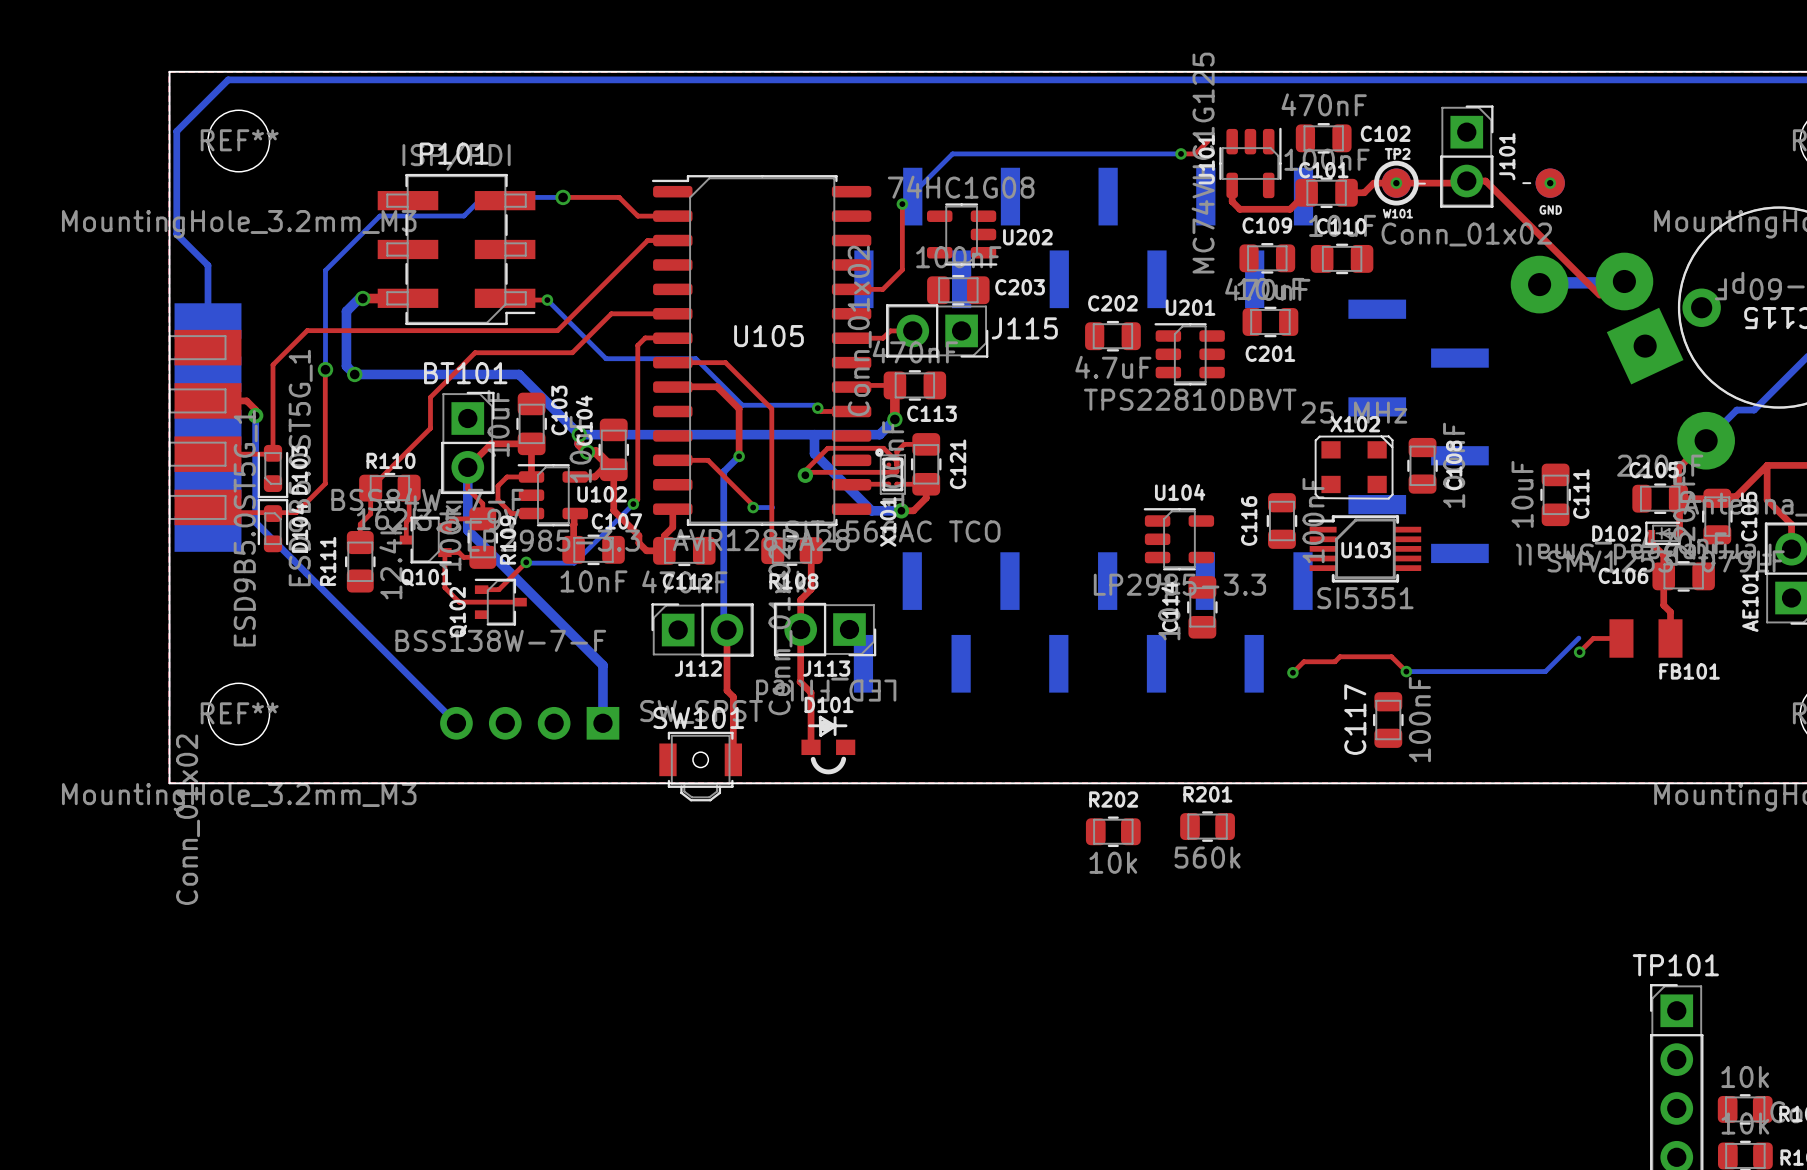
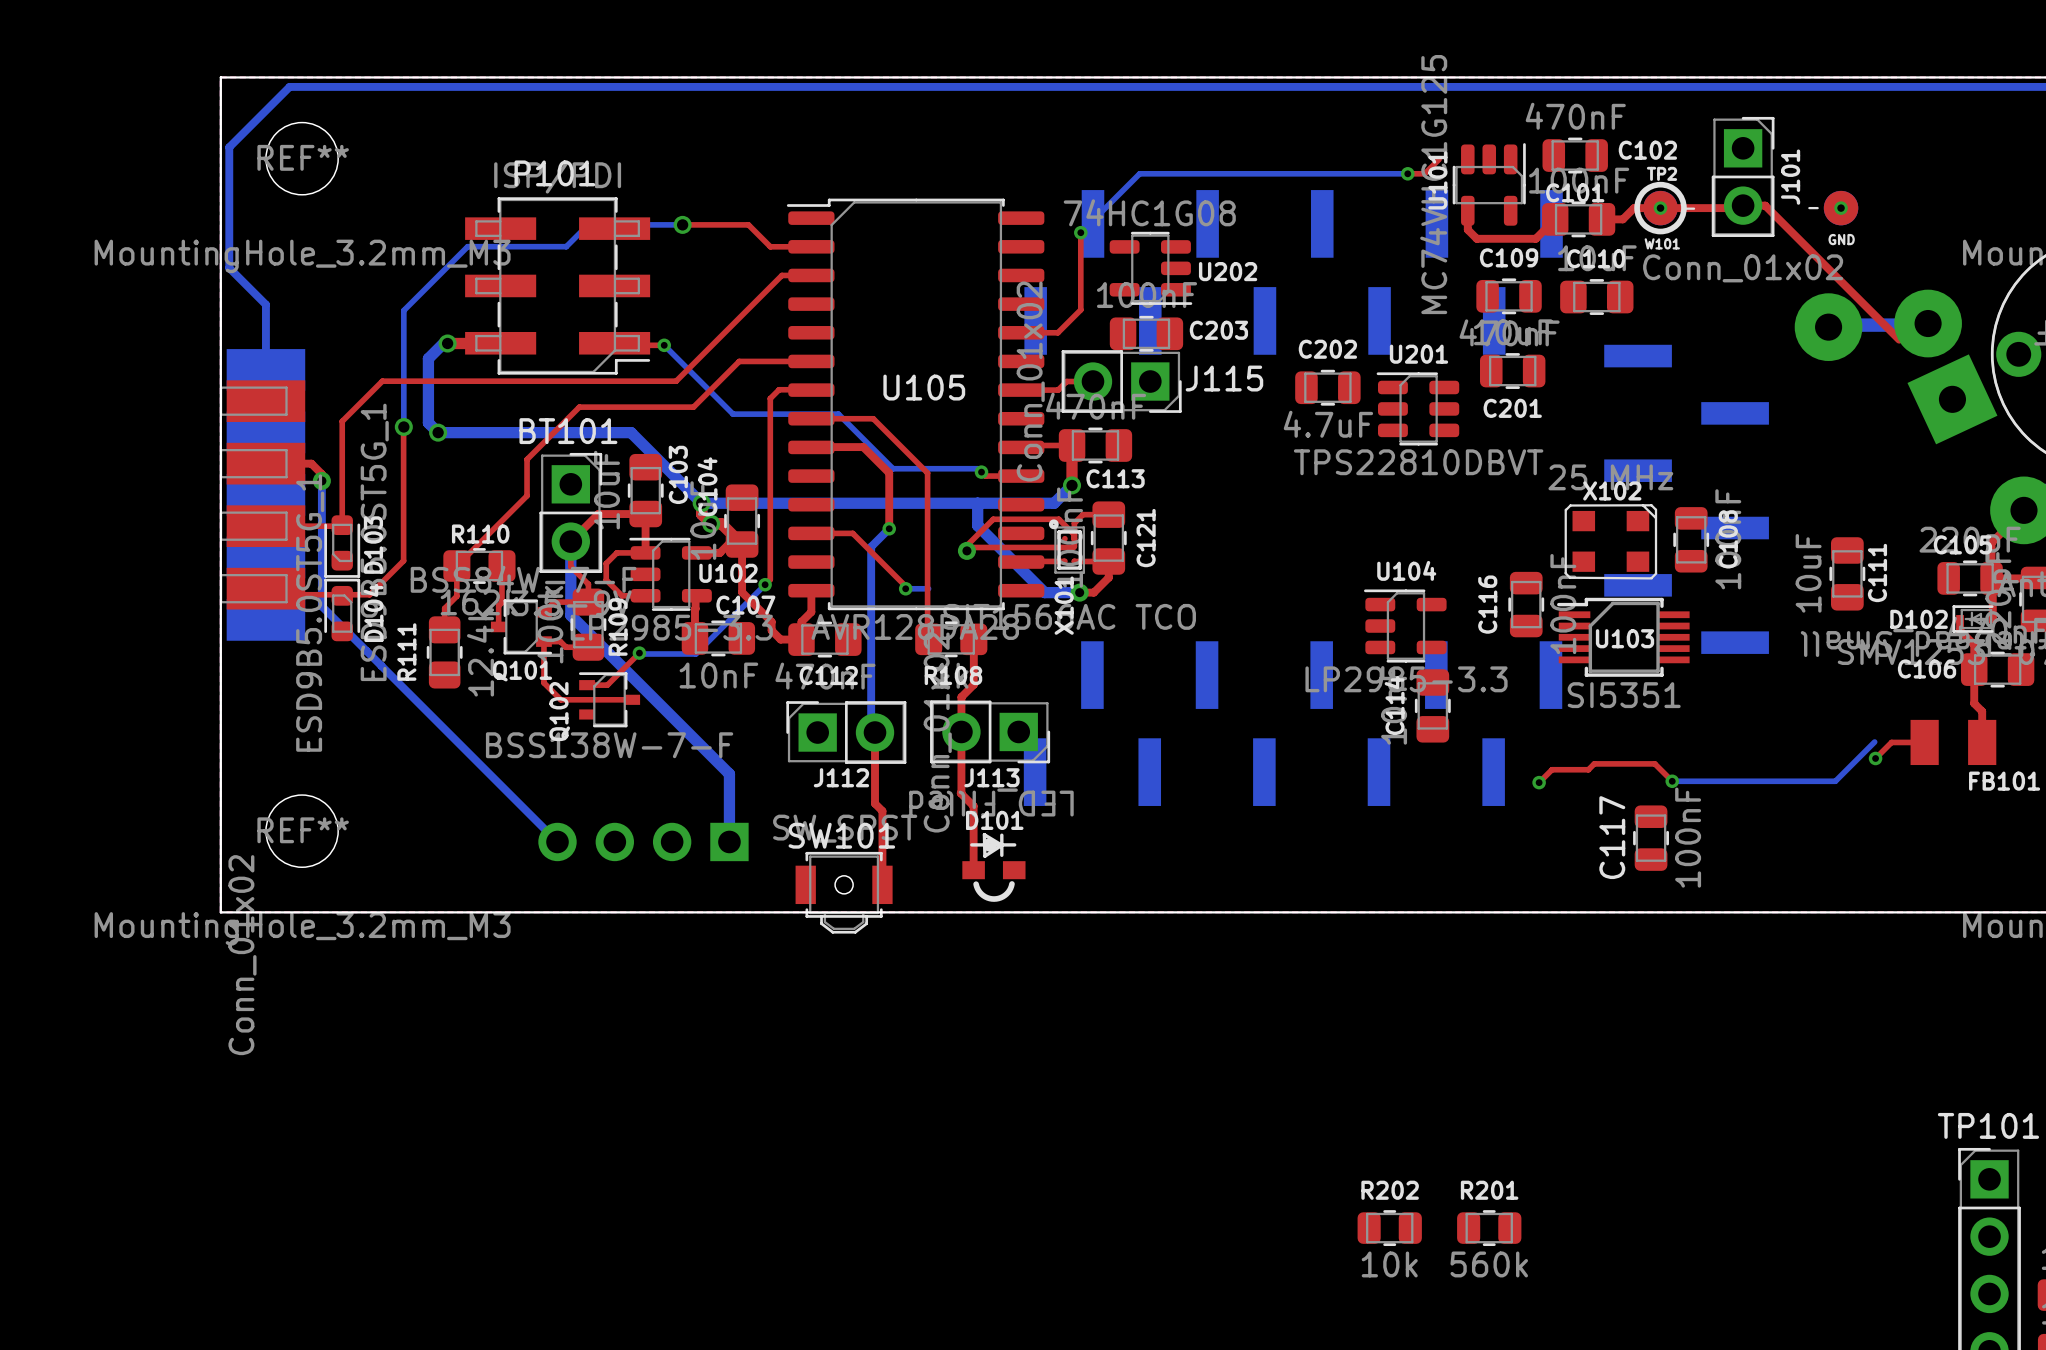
R201 position: (1207, 826) -> (1489, 1228)
R202 position: (1113, 831) -> (1389, 1228)

